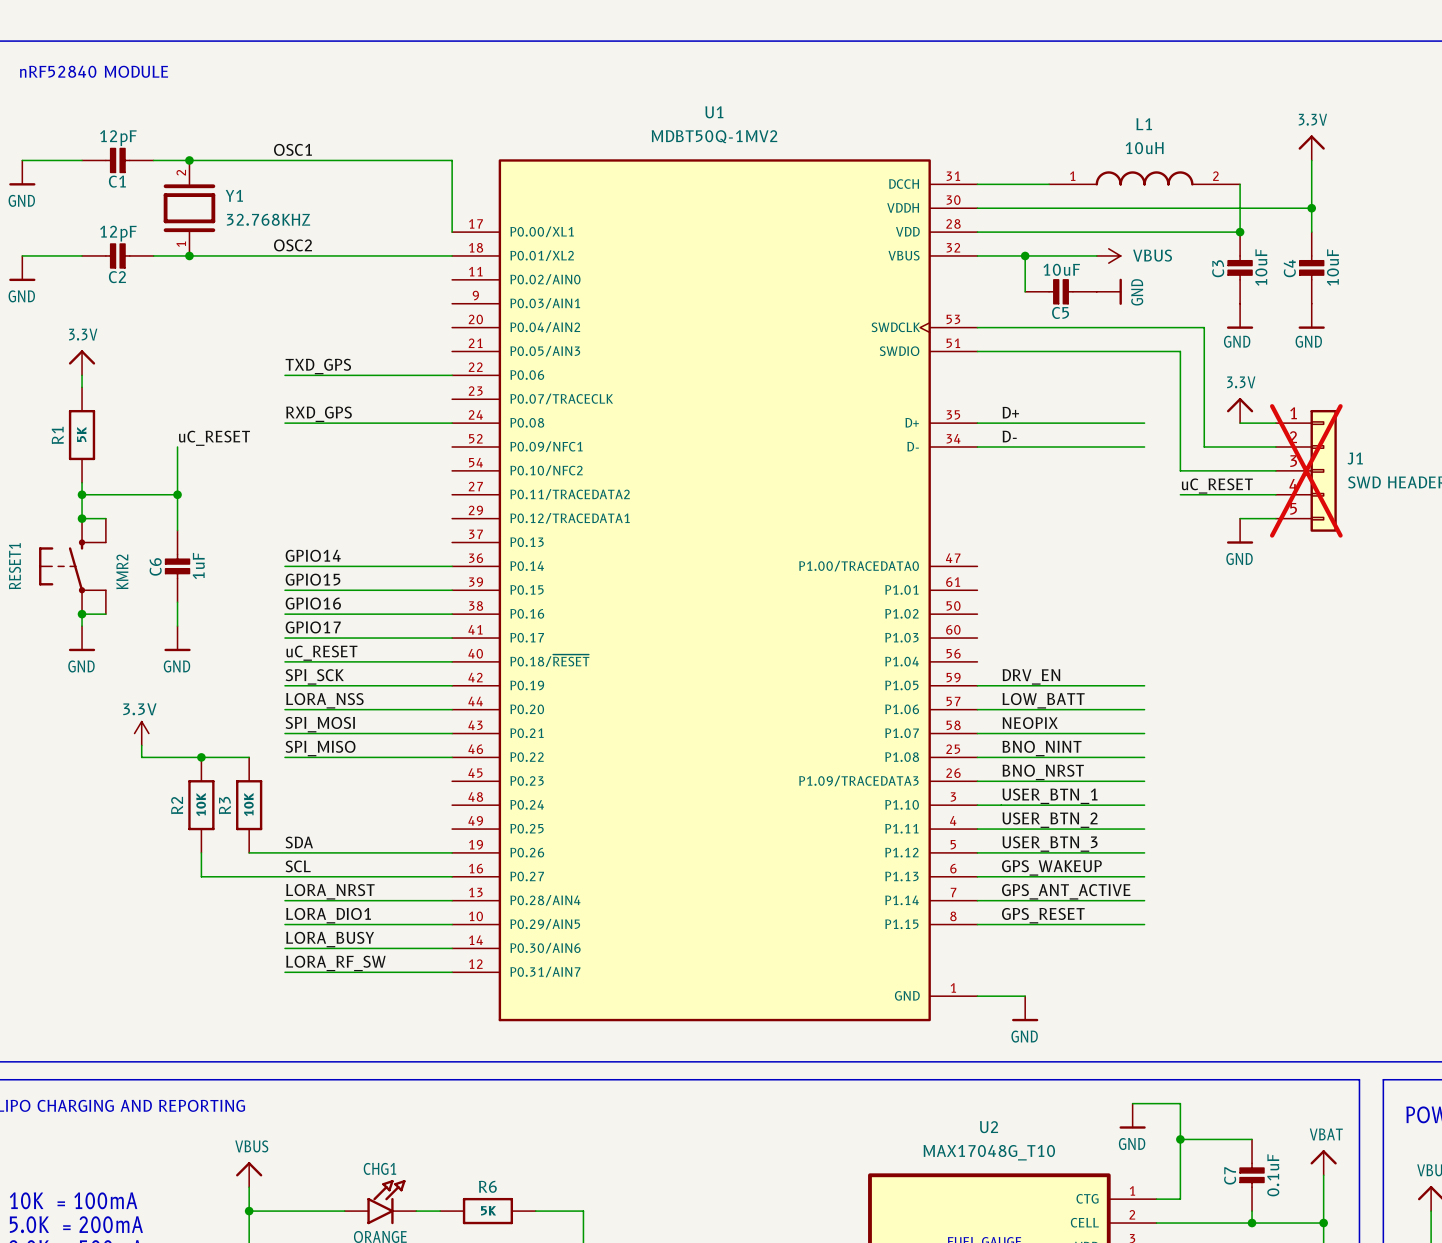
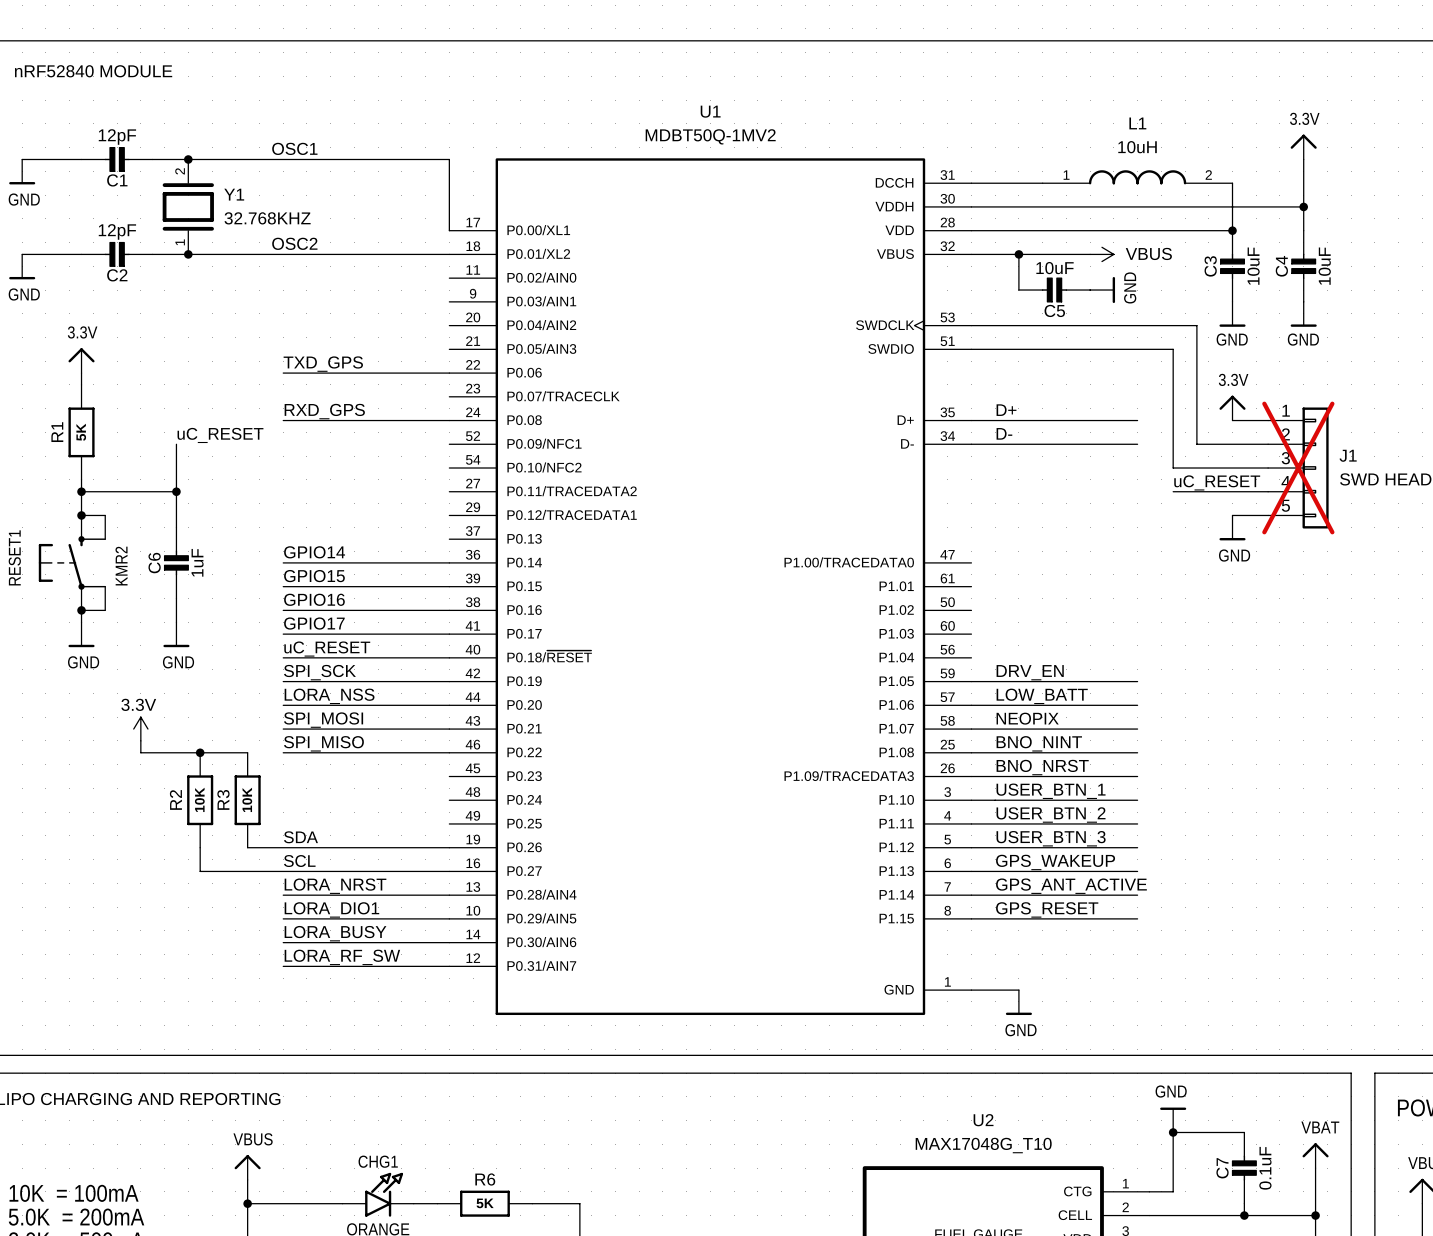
wire: (1132, 1103) (1180, 1103) (1180, 1139) -> none
power symbol position: GND (1132, 1116) -> GND (1173, 1120)
power symbol rotation: 0° (1132, 1127) -> 180° (1173, 1108)

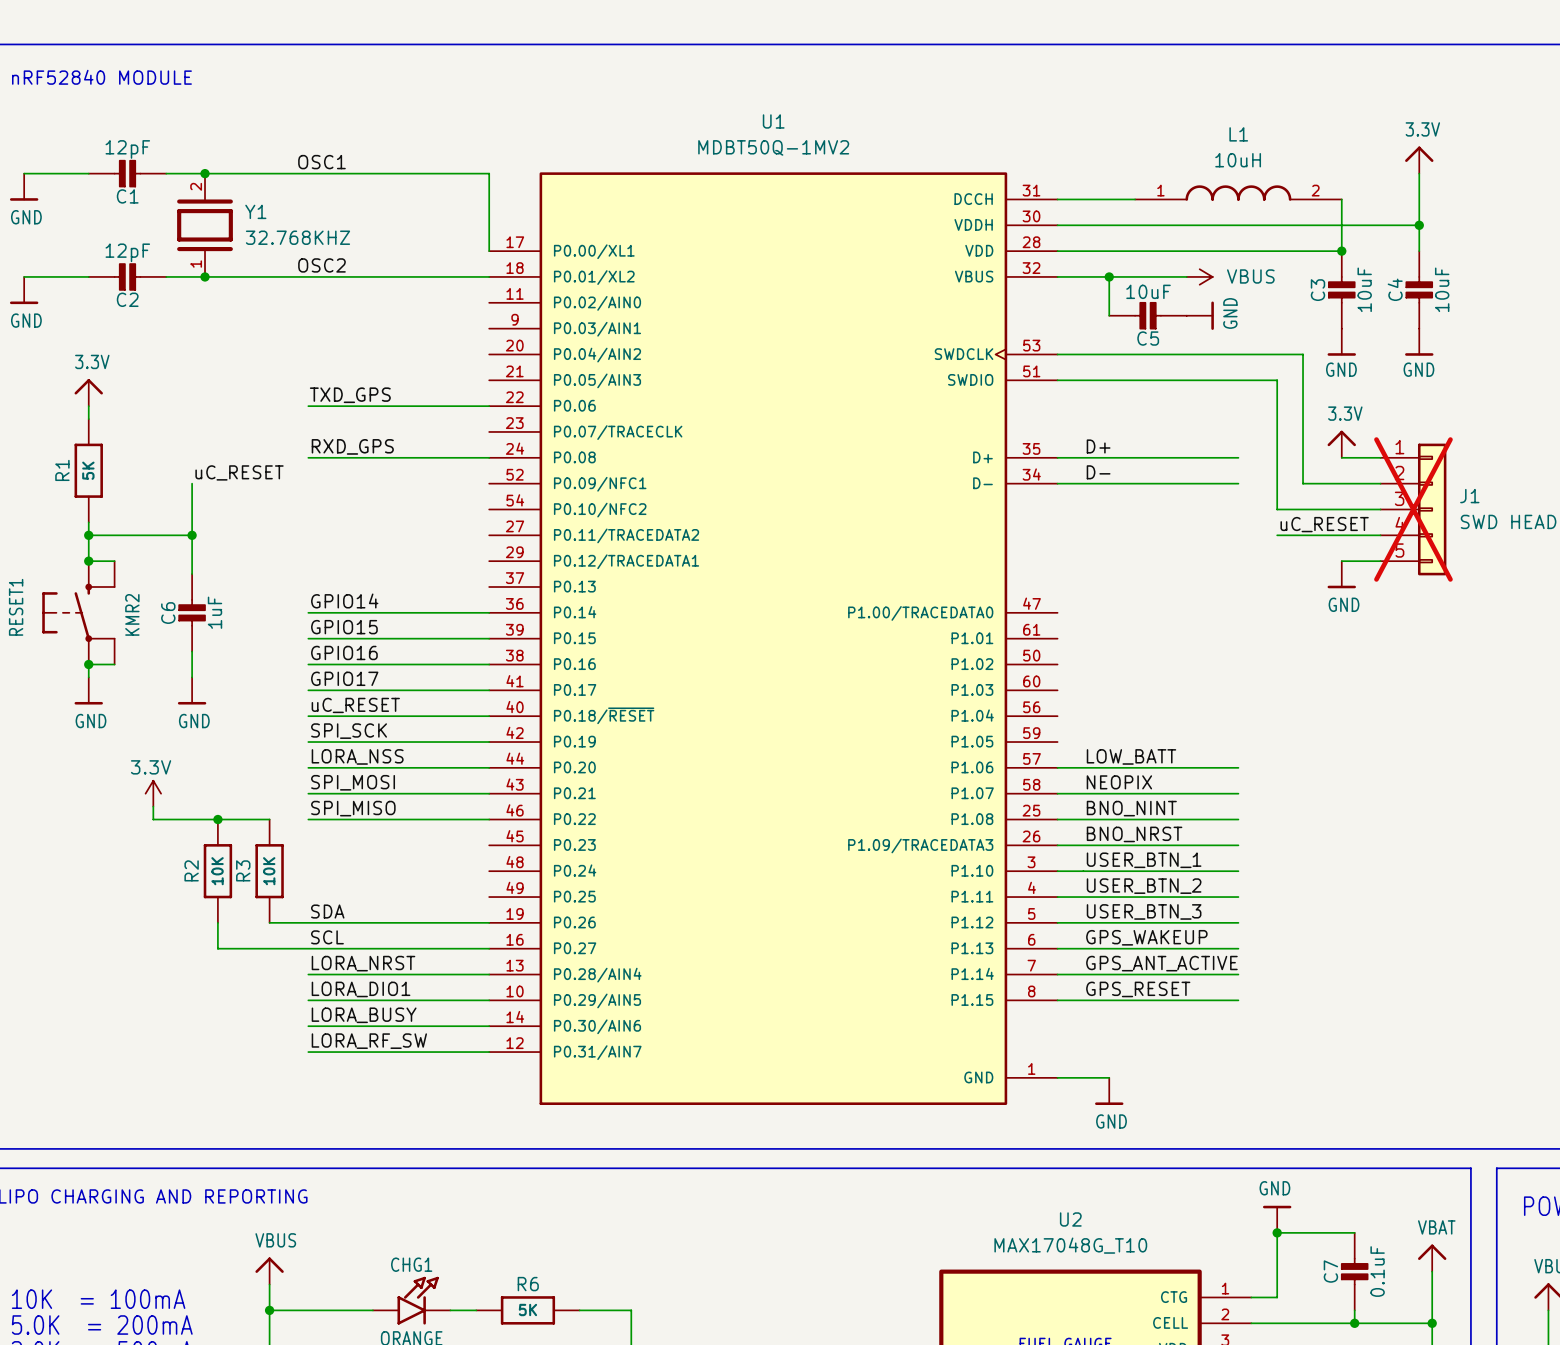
label: DRV_EN (1030, 672) -> none
wire: (971, 681) (1137, 681) -> none

